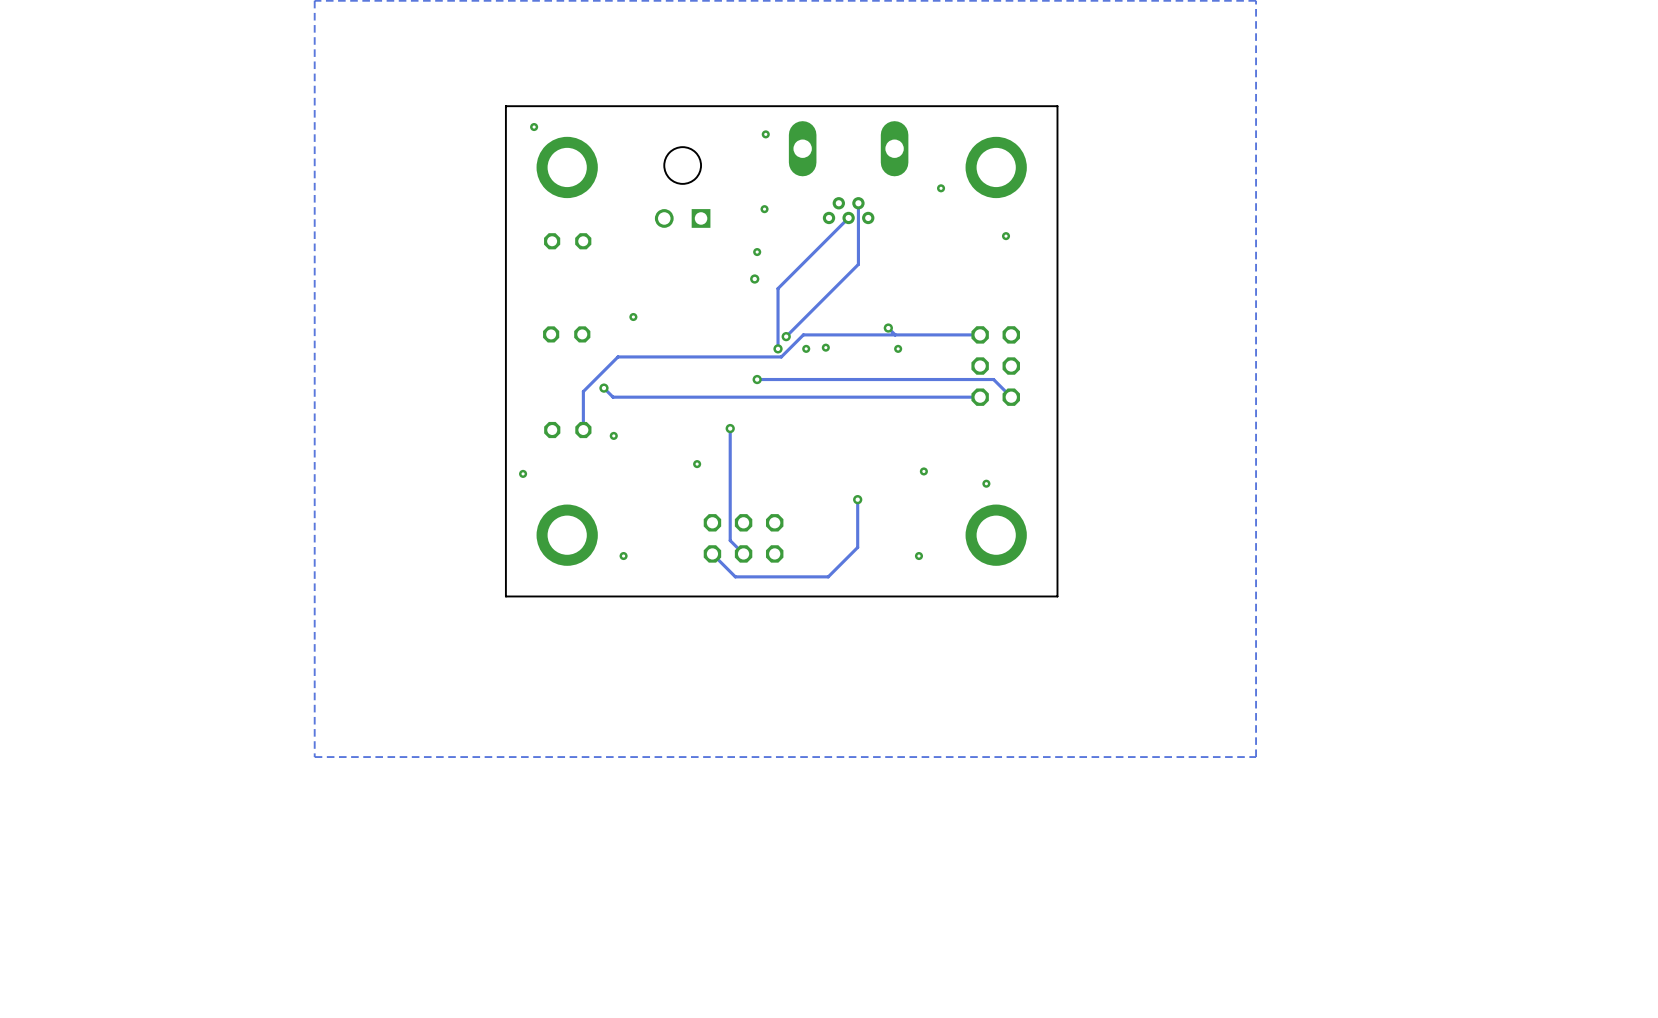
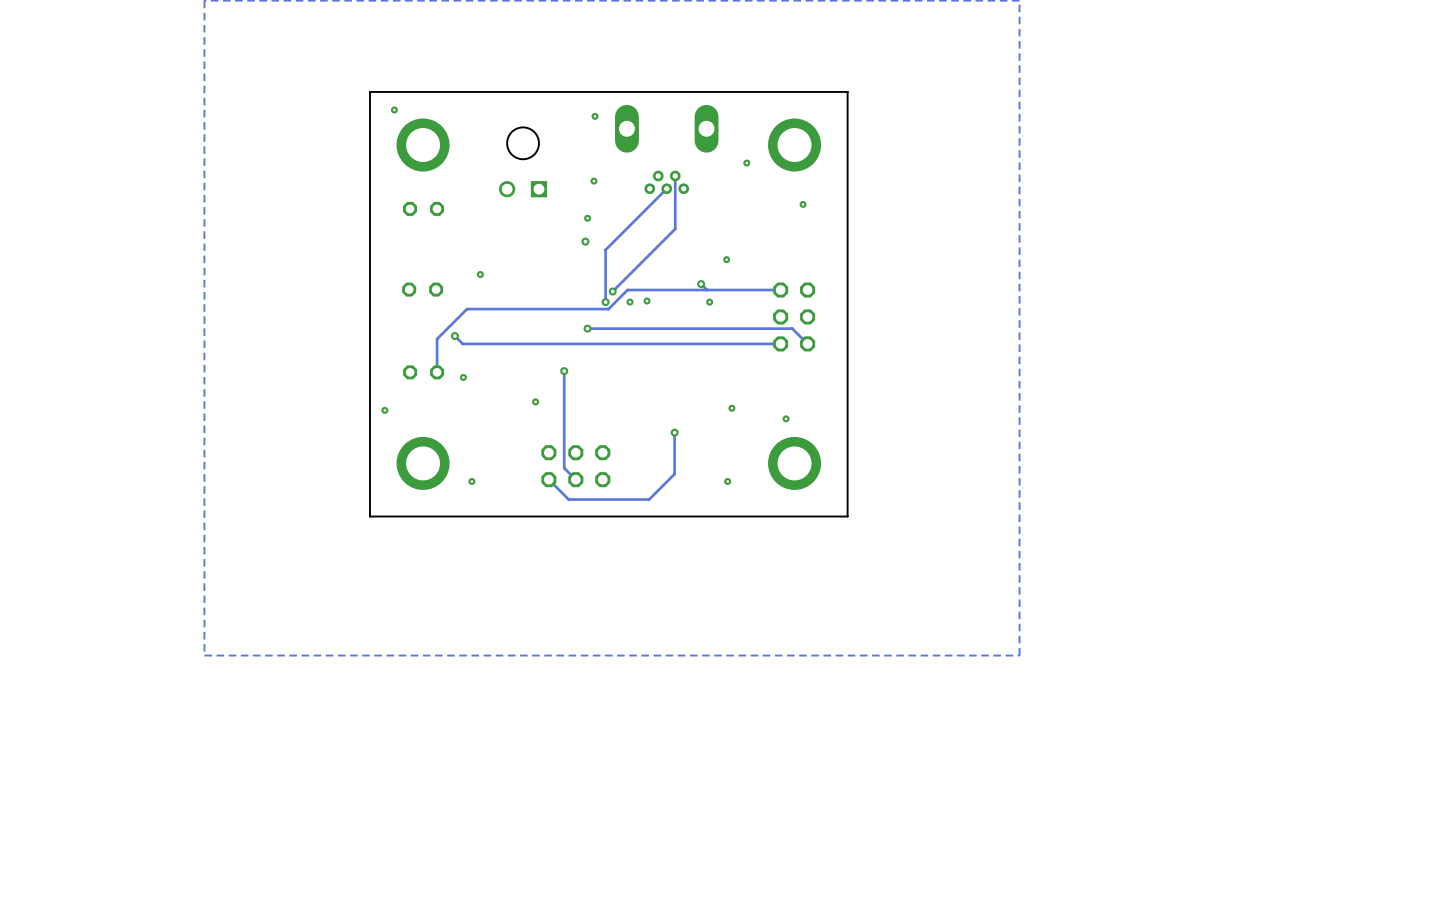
via: none -> (726, 259)

